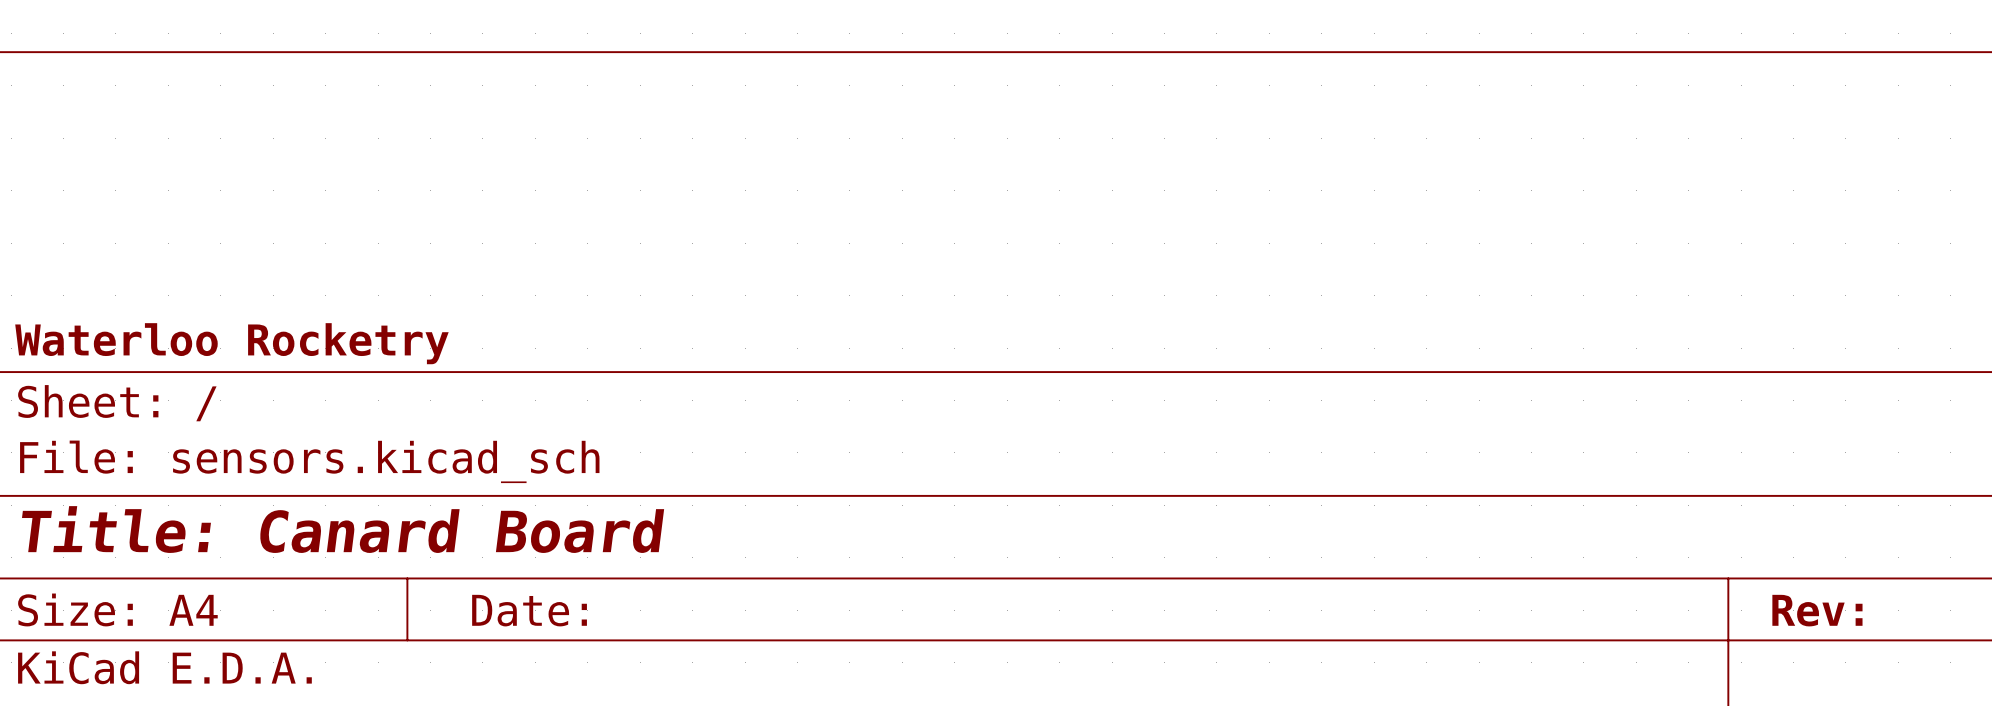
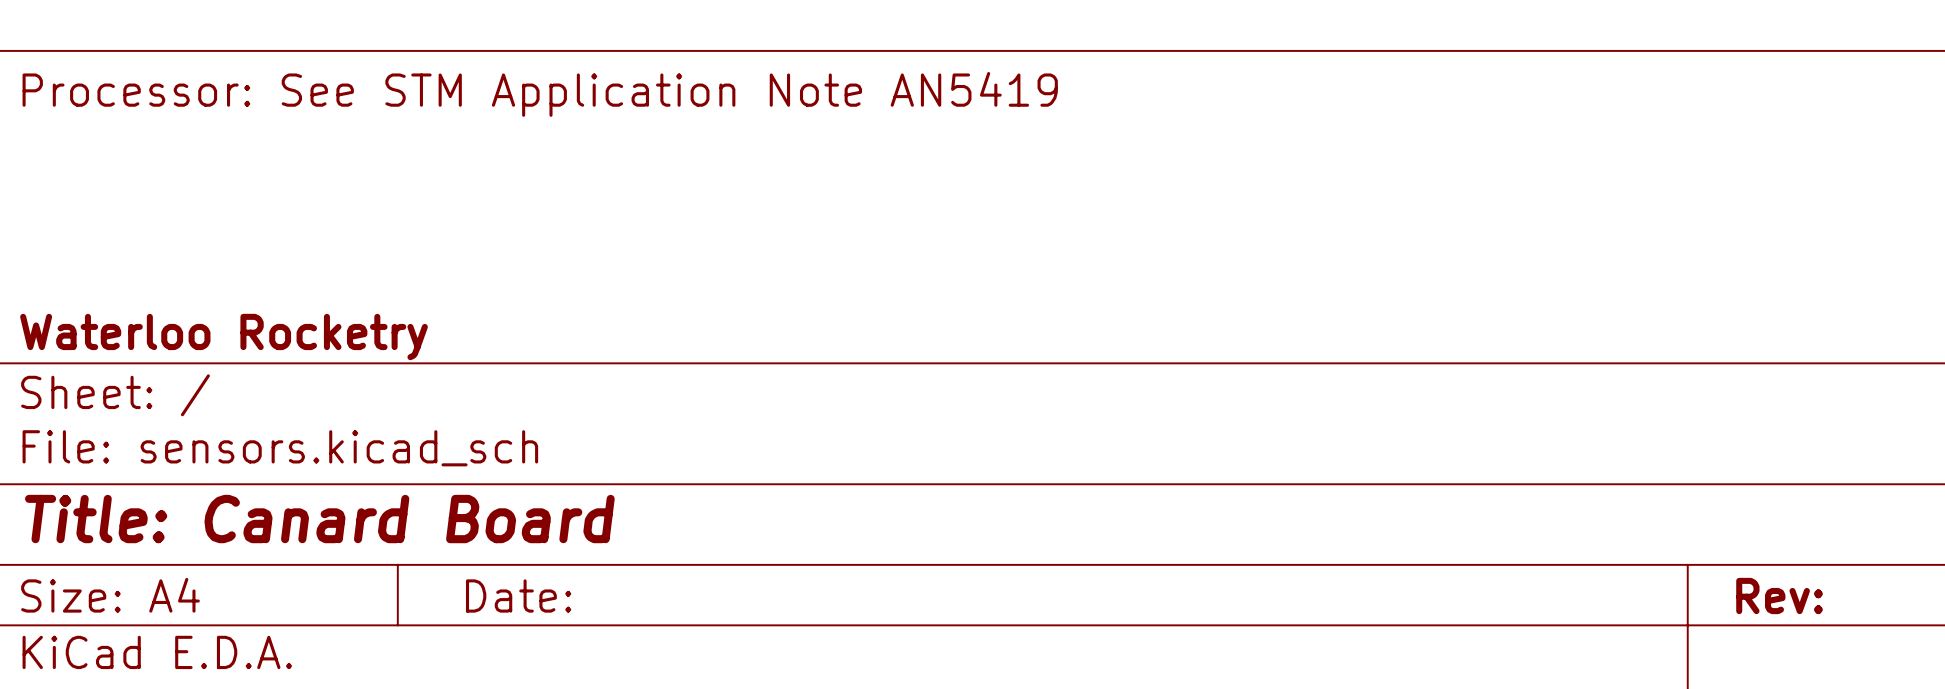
title block: none -> Processor: See STM Application Note AN5419 (540, 94)

